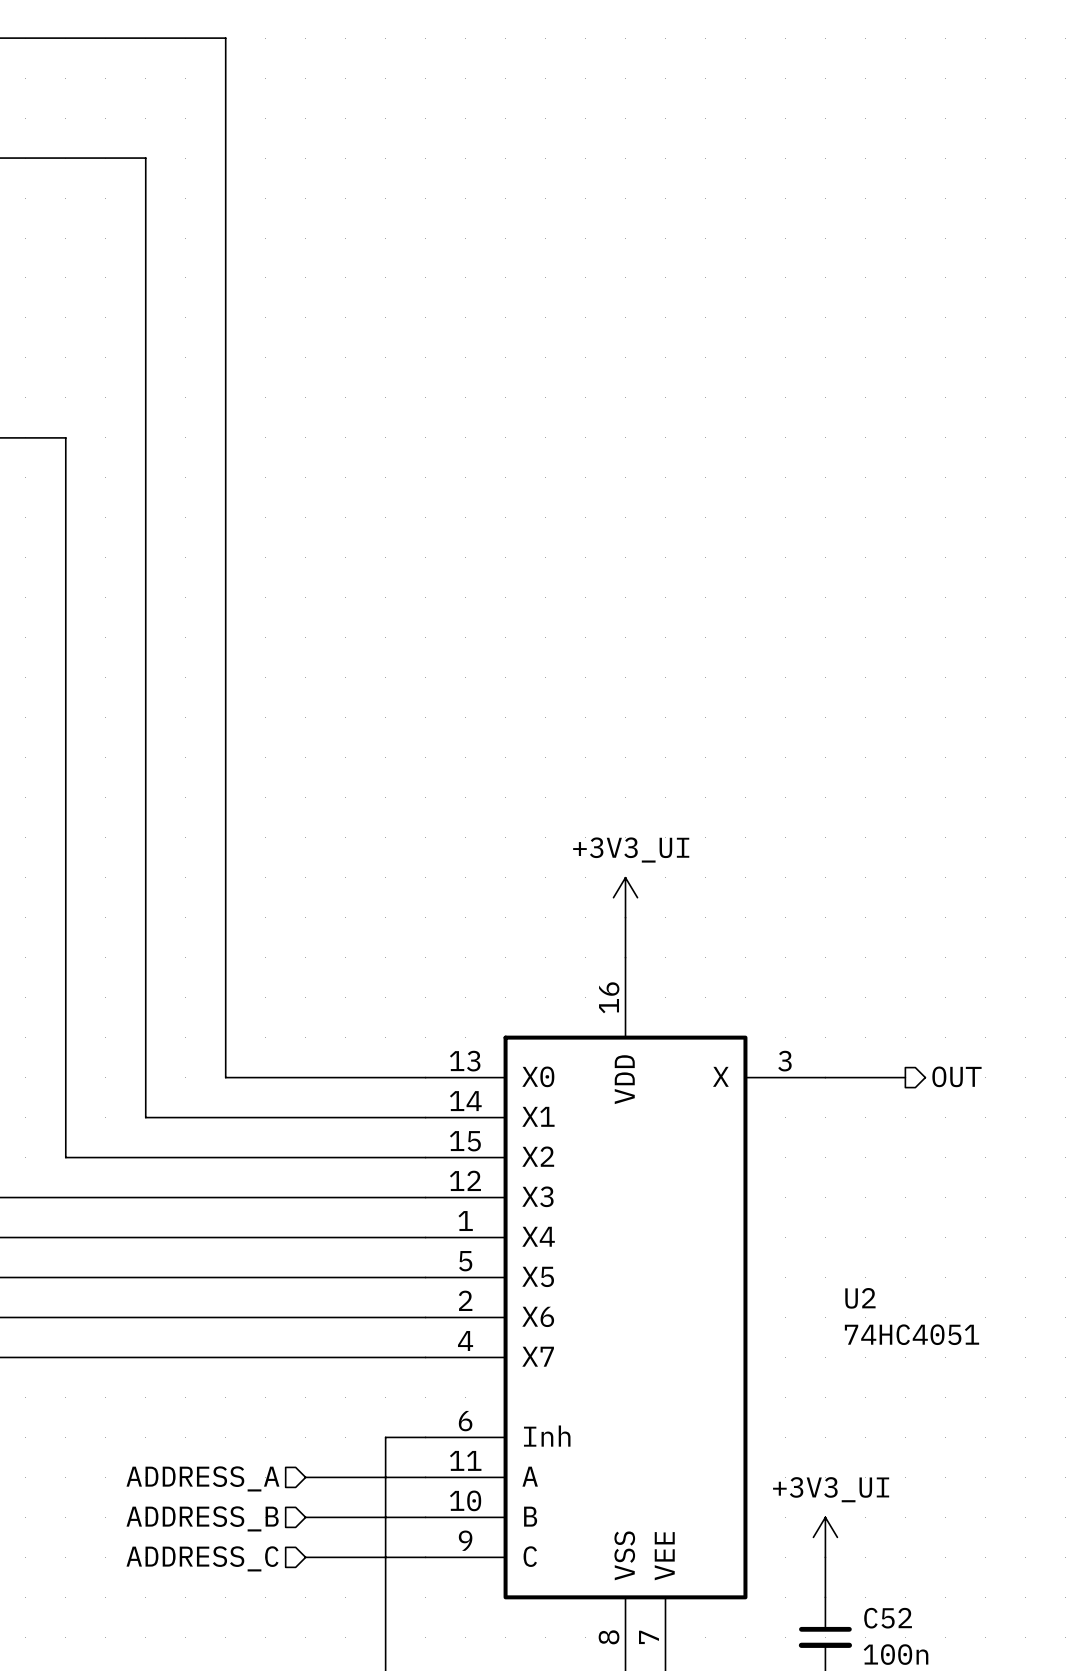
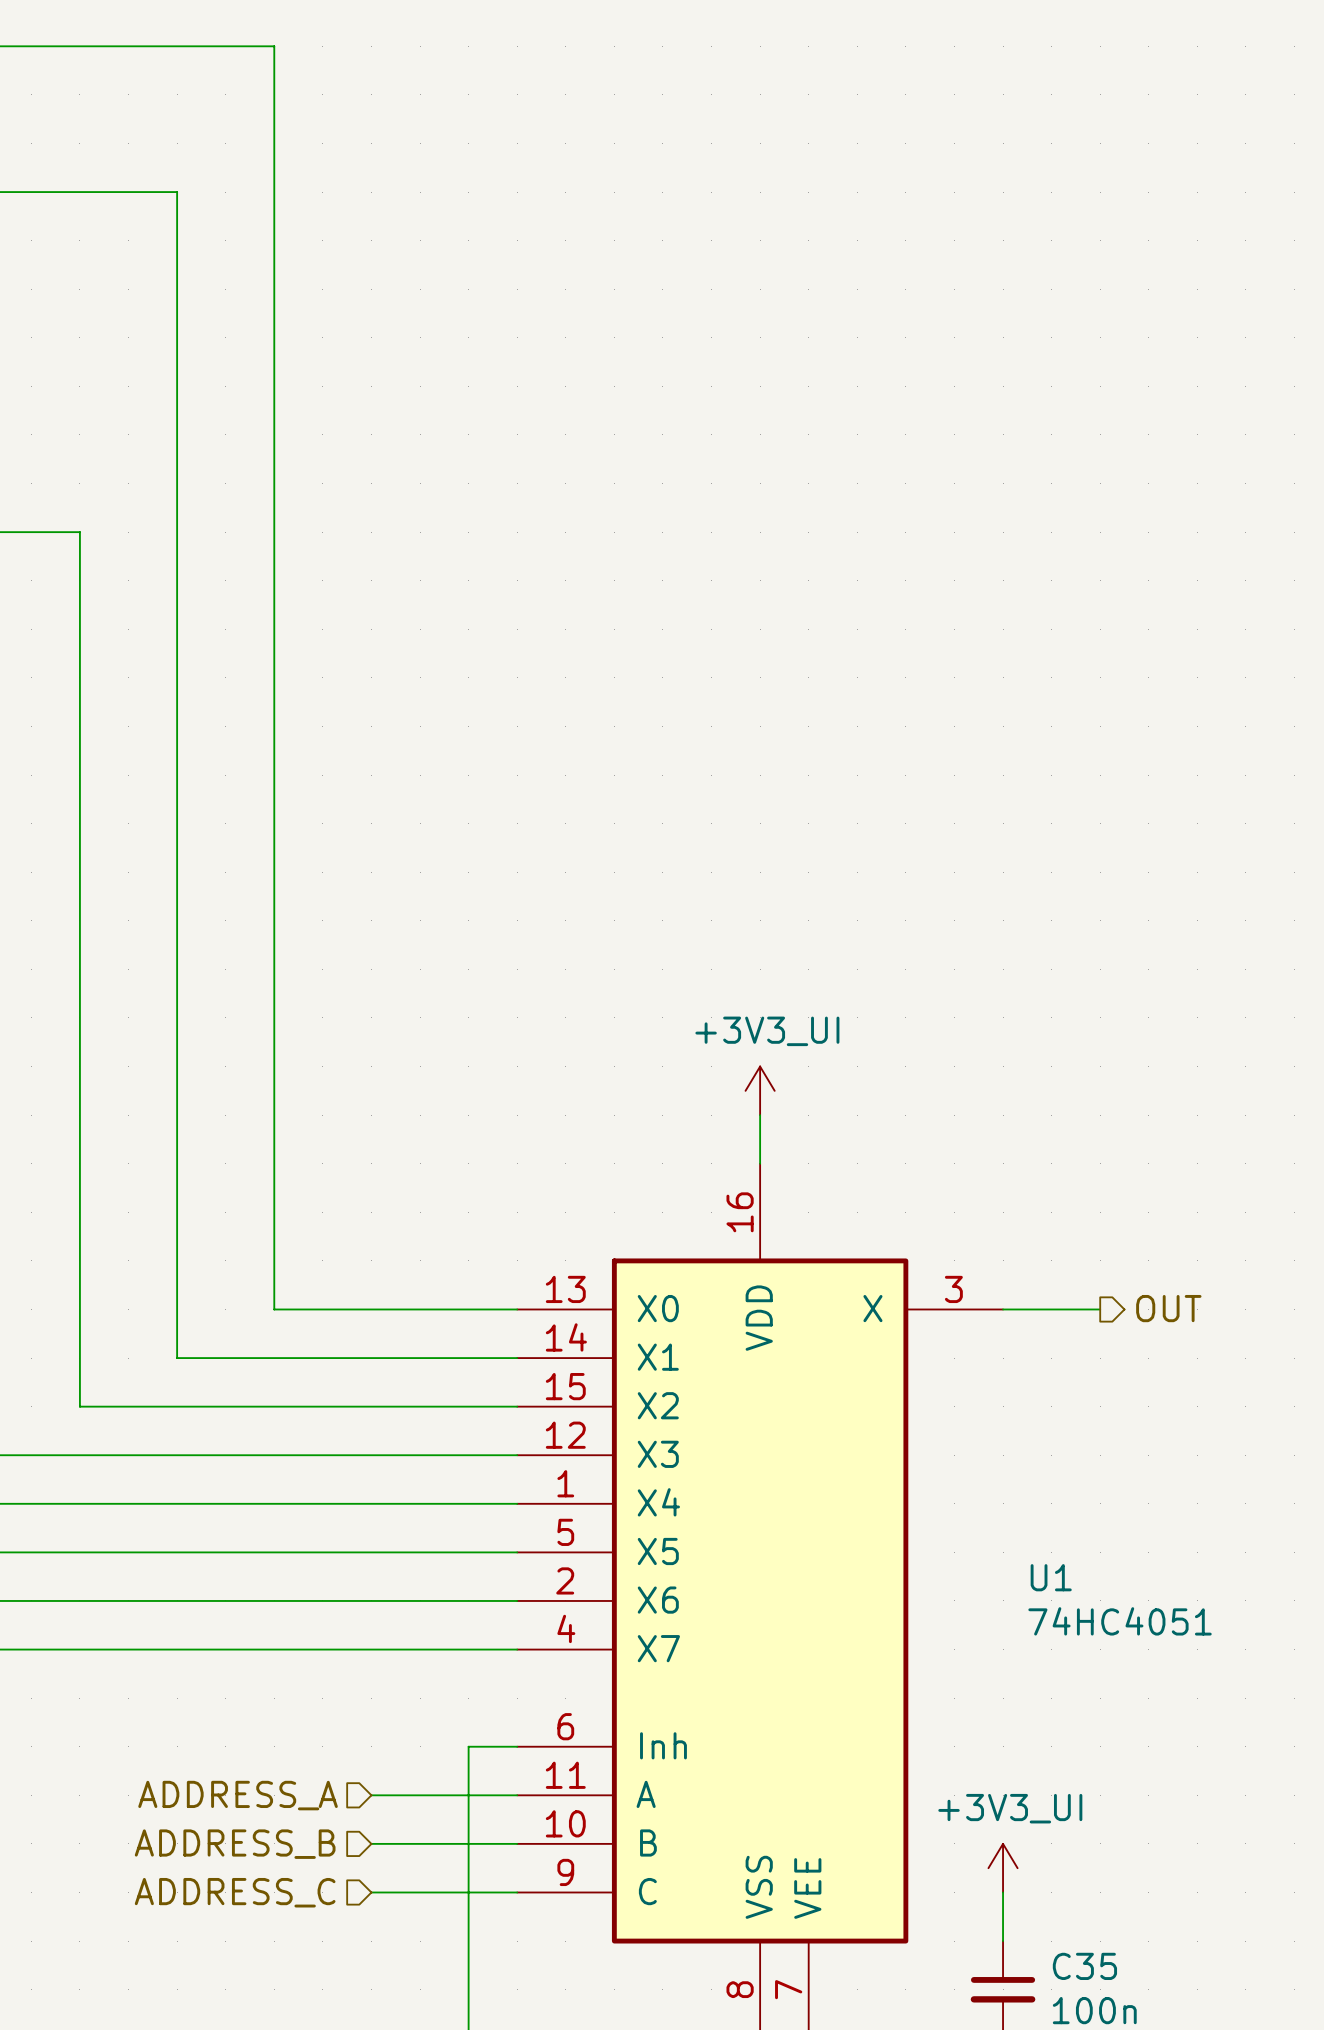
U2 name: U2 (860, 1298) -> U1 (1051, 1577)
C52 name: C52 (888, 1618) -> C35 (1084, 1966)

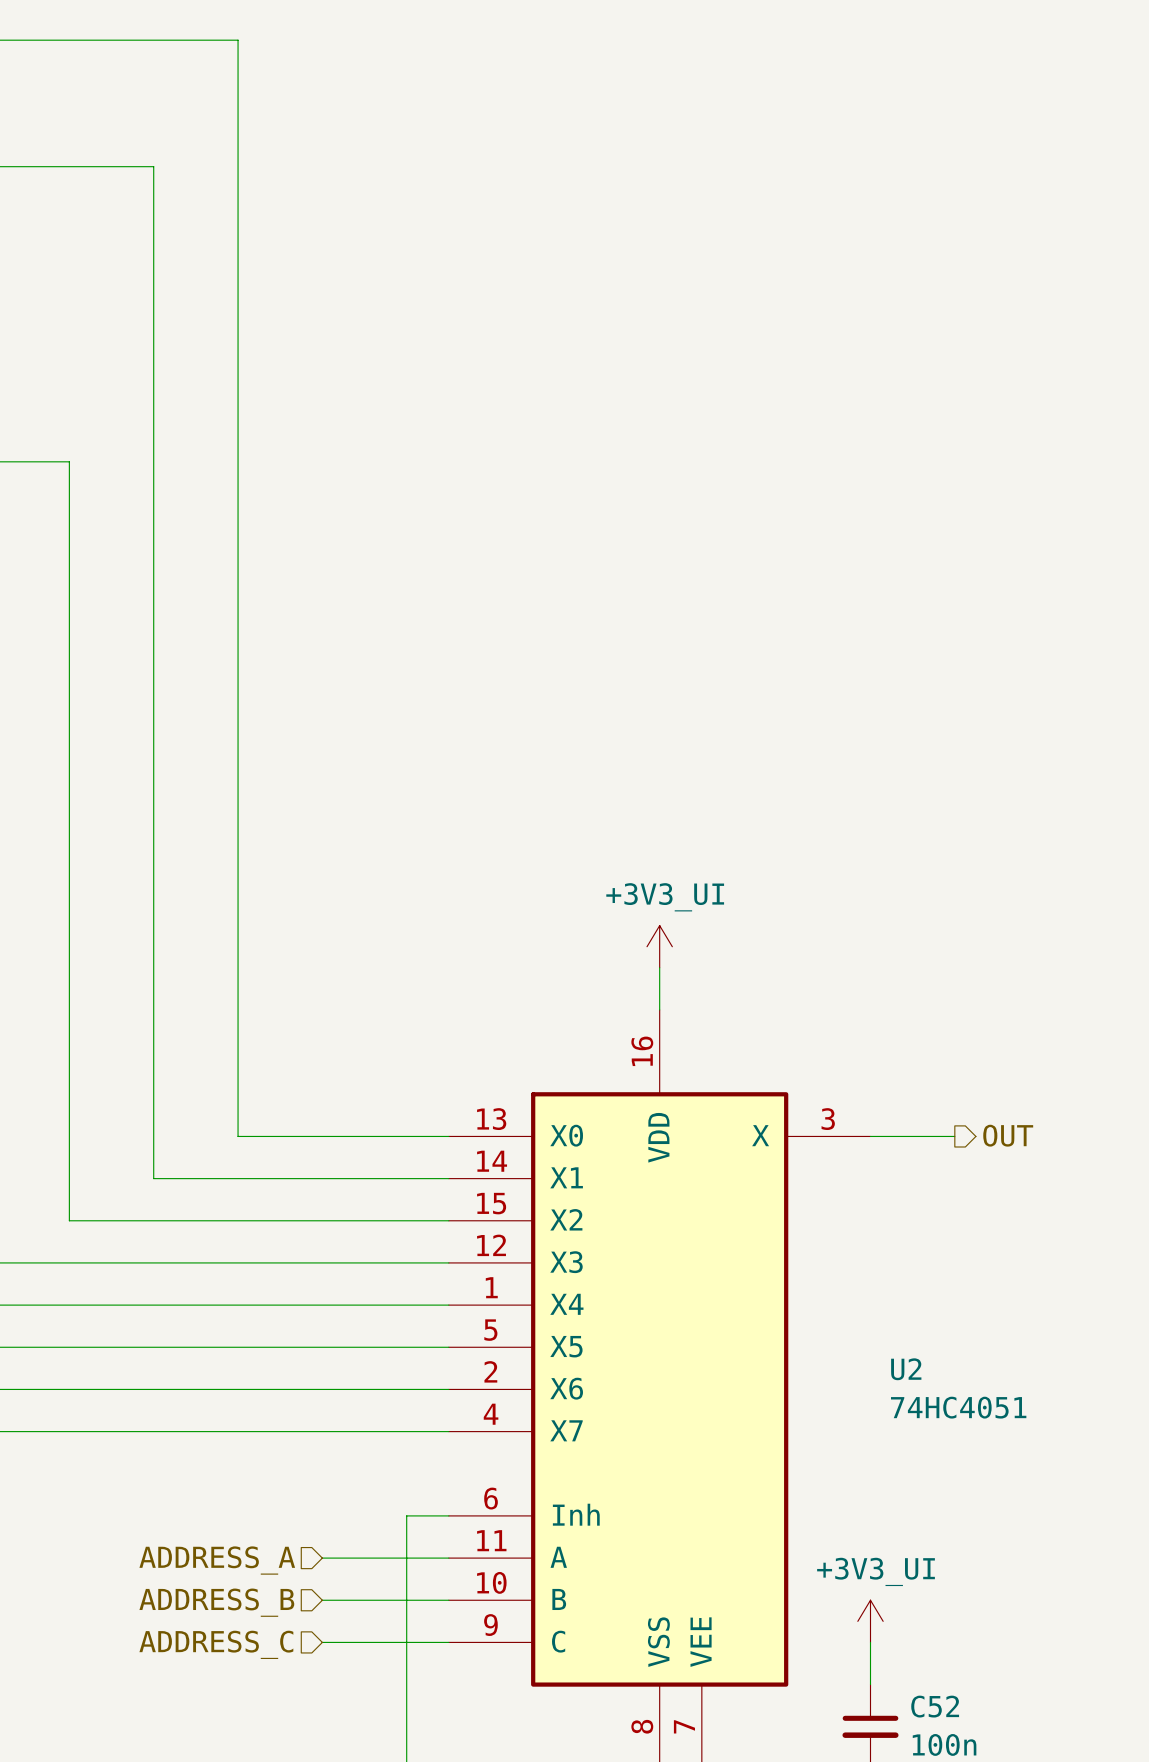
U1 name: U1 (1051, 1577) -> U2 (906, 1369)
C35 name: C35 (1084, 1966) -> C52 (935, 1706)

